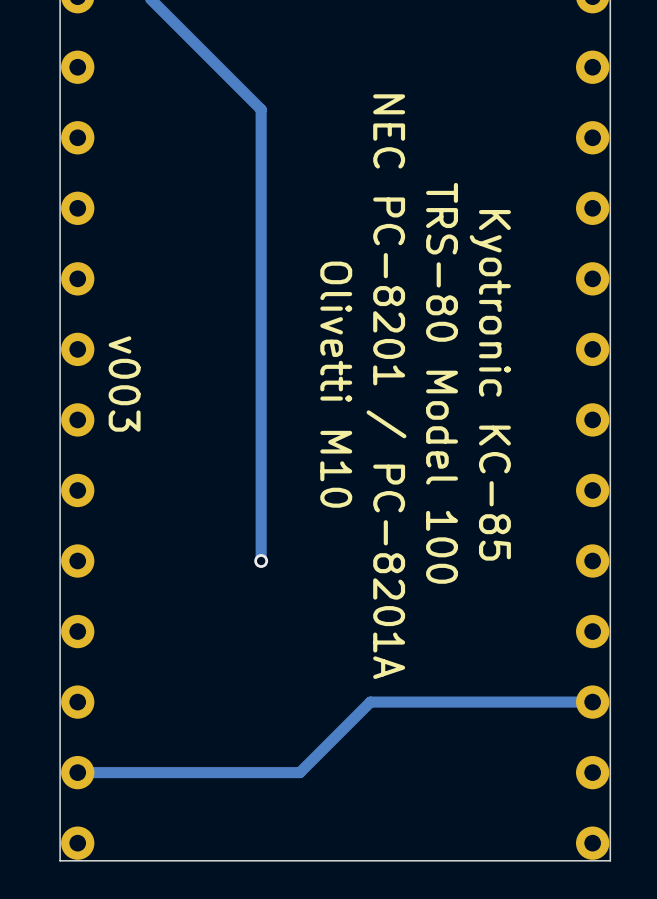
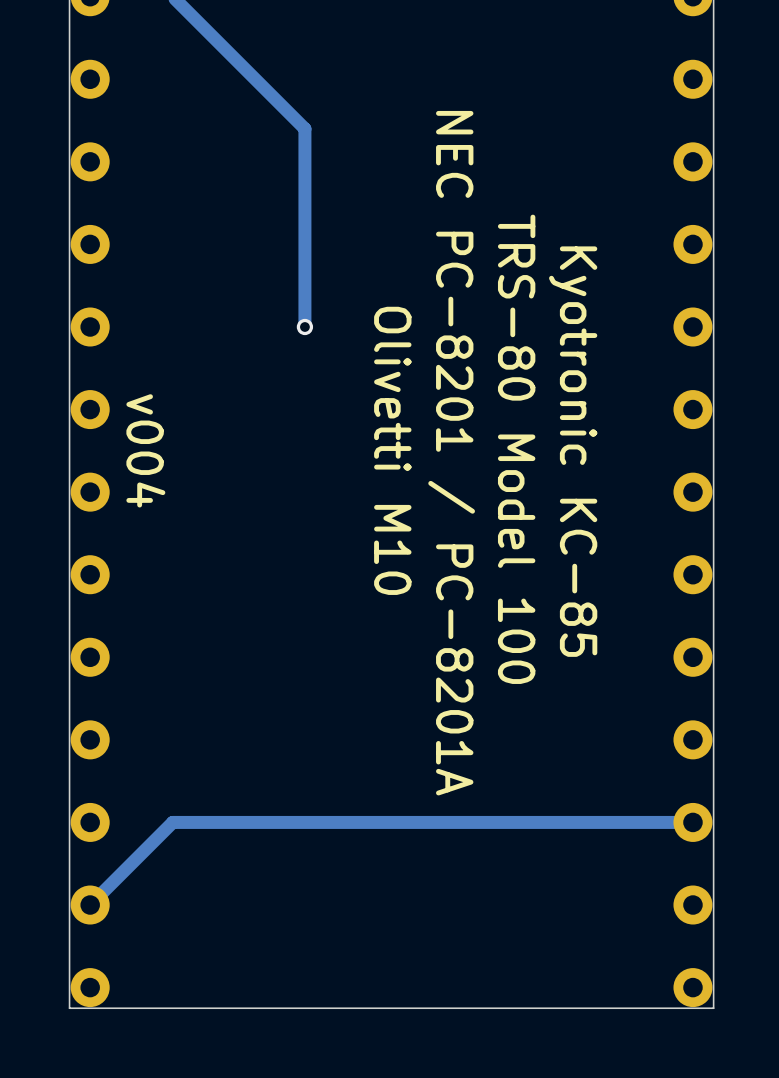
track: (261, 278) (261, 561) -> none
via: none -> (304, 327)
text: v003 (124, 384) -> v004 (145, 450)
via: (261, 561) -> none
track: (370, 702) (299, 772) (77, 772) -> (432, 822) (172, 822) (90, 905)

